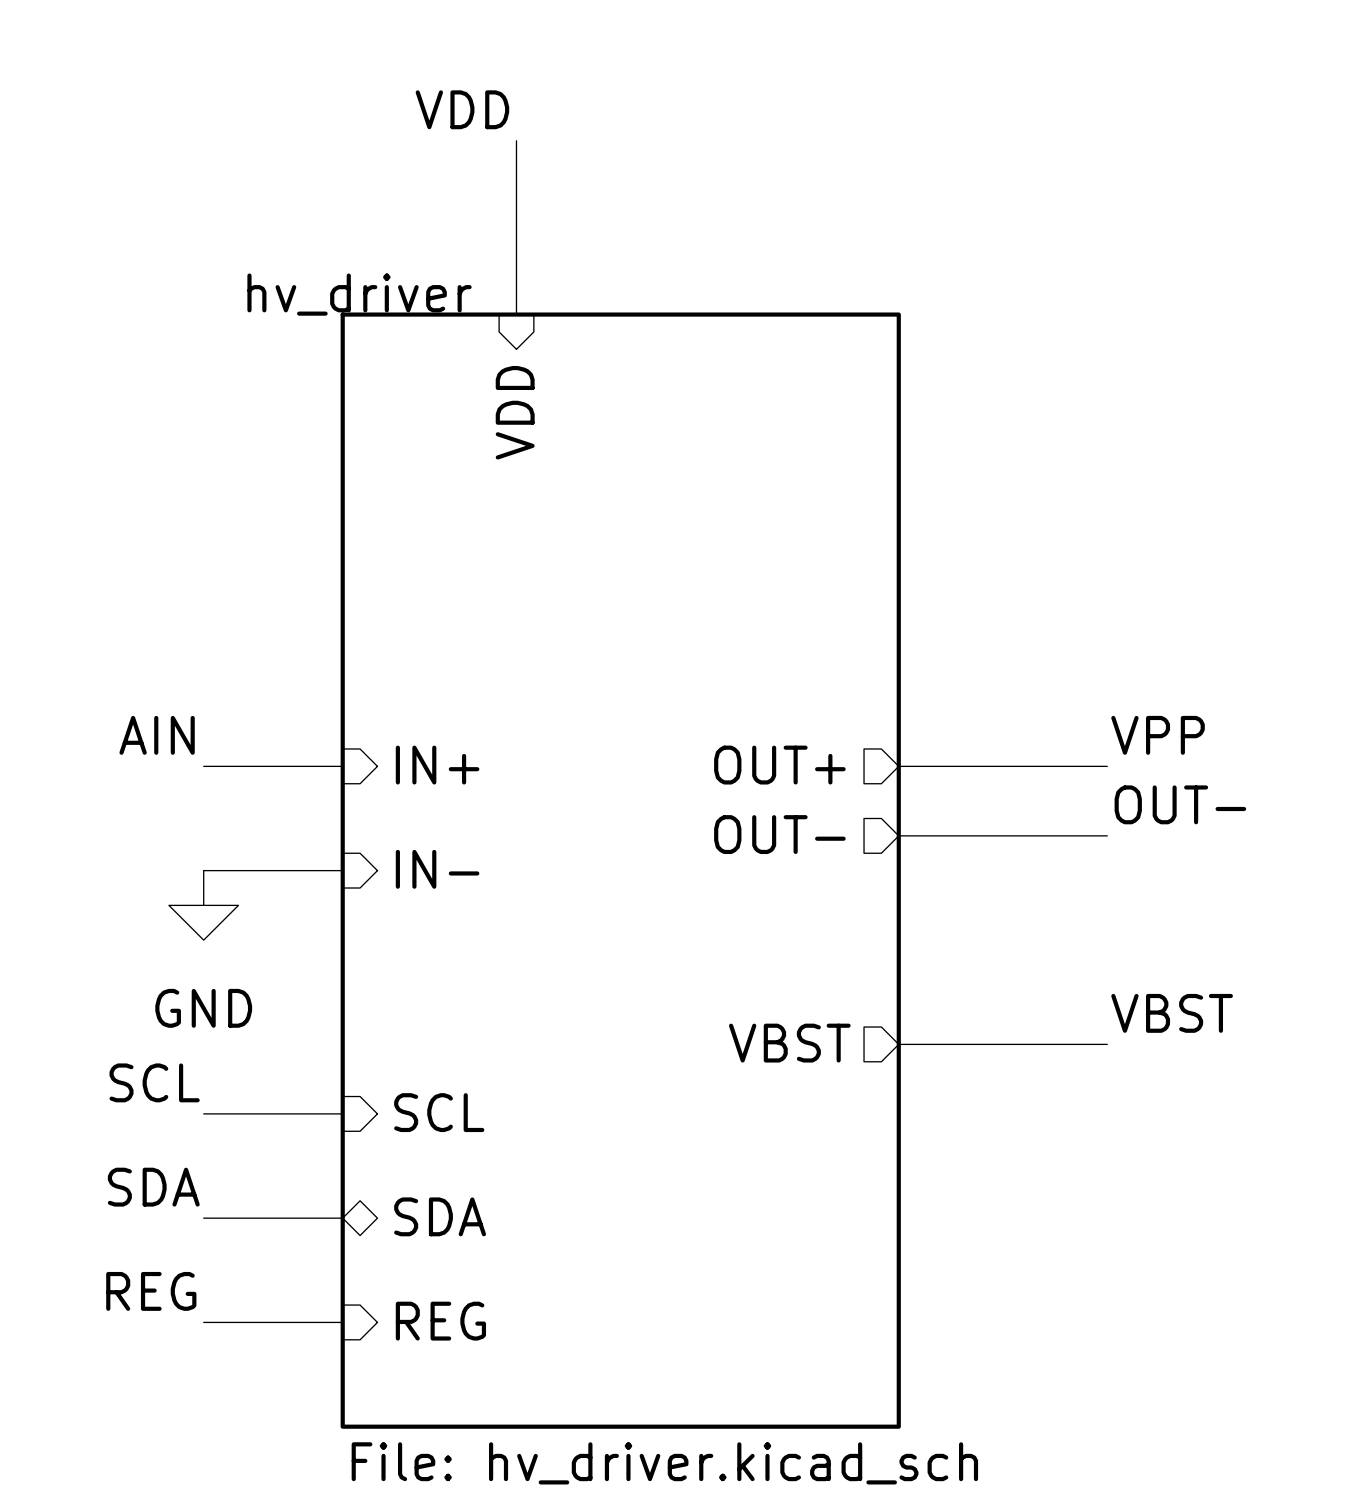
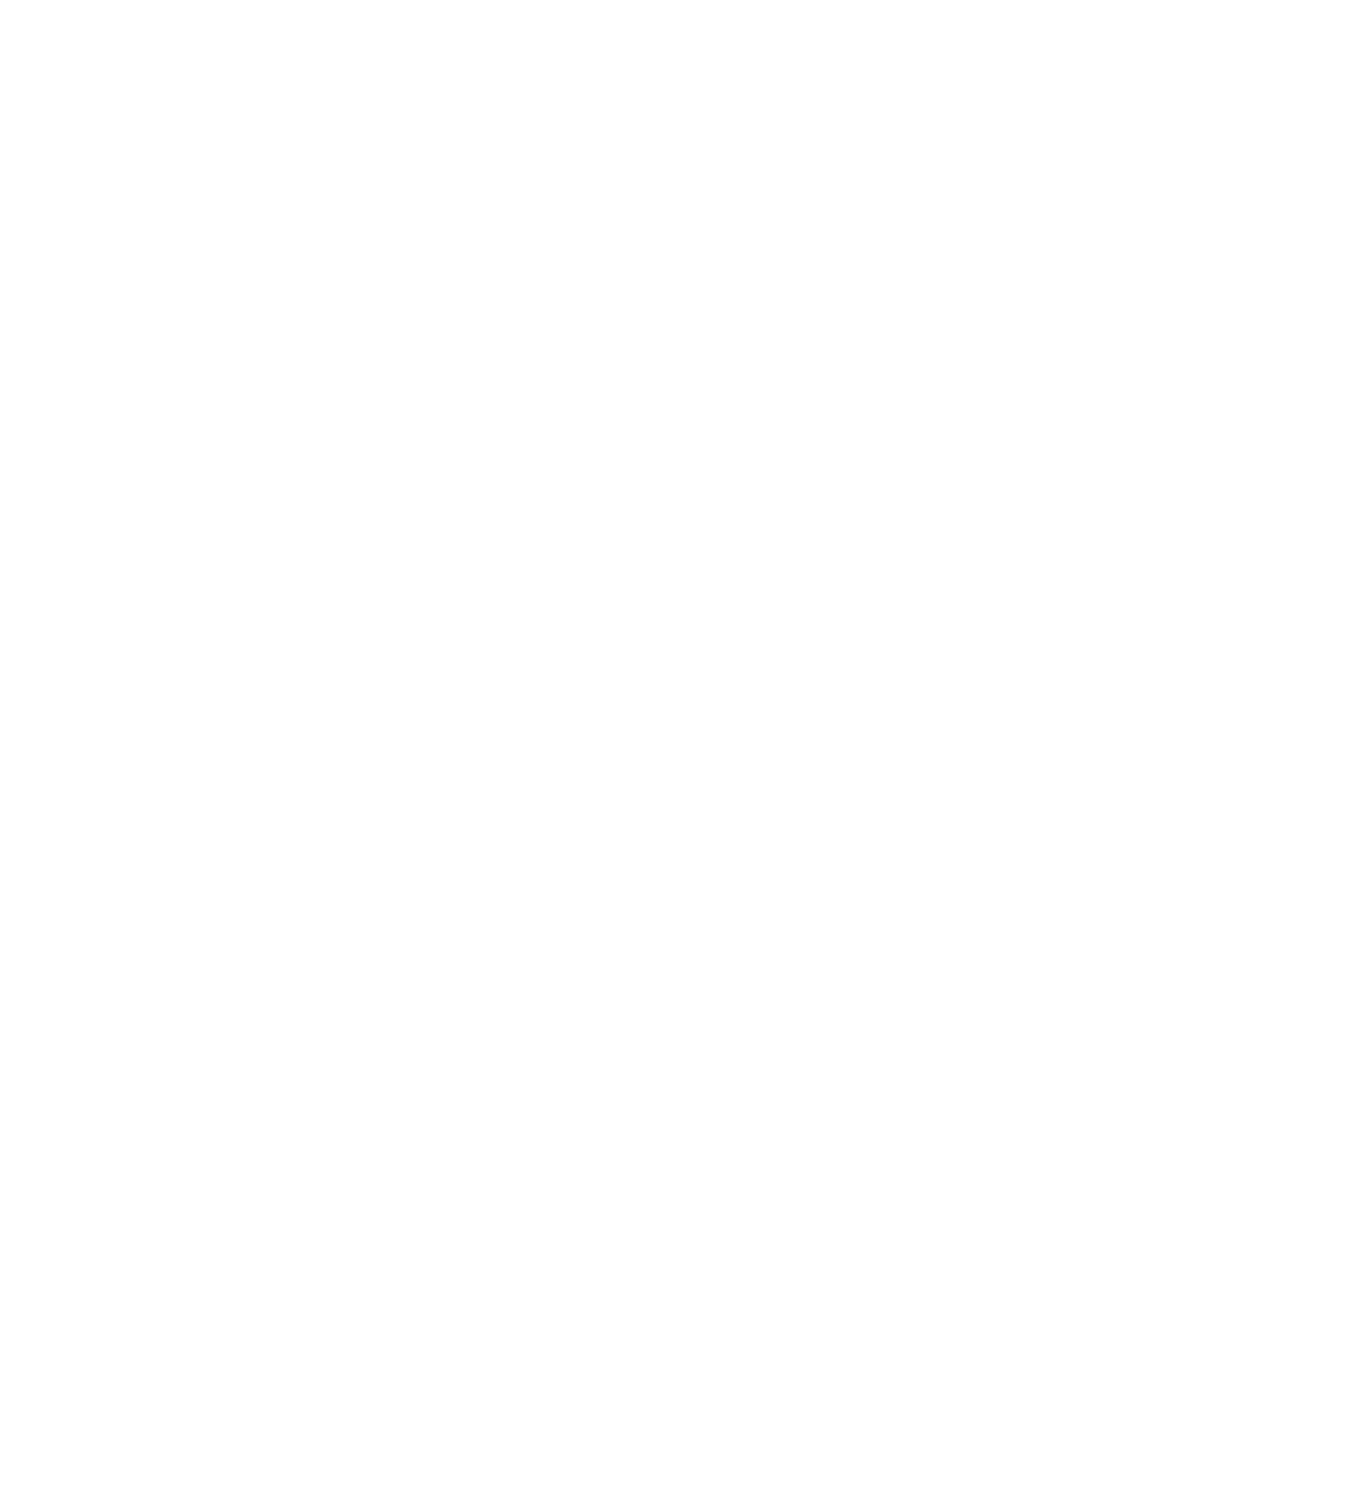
label: VDD (462, 109) -> none
wire: (516, 140) (516, 314) -> none
sheet pin: VDD (515, 412) -> none
label: AIN (157, 735) -> none
label: VPP (1158, 735) -> none
sheet pin: IN+ (437, 765) -> none
sheet pin: OUT+ (779, 765) -> none
wire: (203, 766) (342, 766) -> none
wire: (898, 766) (1107, 766) -> none
label: OUT- (1180, 804) -> none
sheet pin: OUT- (779, 834) -> none
wire: (898, 835) (1107, 835) -> none
sheet pin: IN- (437, 869) -> none
wire: (203, 870) (342, 870) -> none
sheet hv_driver: File: hv_driver.kicad_sch (620, 870) -> none
power symbol: GND (203, 905) -> none
label: VBST (1172, 1013) -> none
sheet pin: VBST (789, 1043) -> none
wire: (898, 1044) (1107, 1044) -> none
label: SCL (154, 1082) -> none
sheet pin: SCL (439, 1112) -> none
wire: (203, 1113) (342, 1113) -> none
label: SDA (153, 1187) -> none
sheet pin: SDA (440, 1216) -> none
wire: (203, 1218) (342, 1218) -> none
label: REG (151, 1291) -> none
sheet pin: REG (440, 1321) -> none
wire: (203, 1322) (342, 1322) -> none

